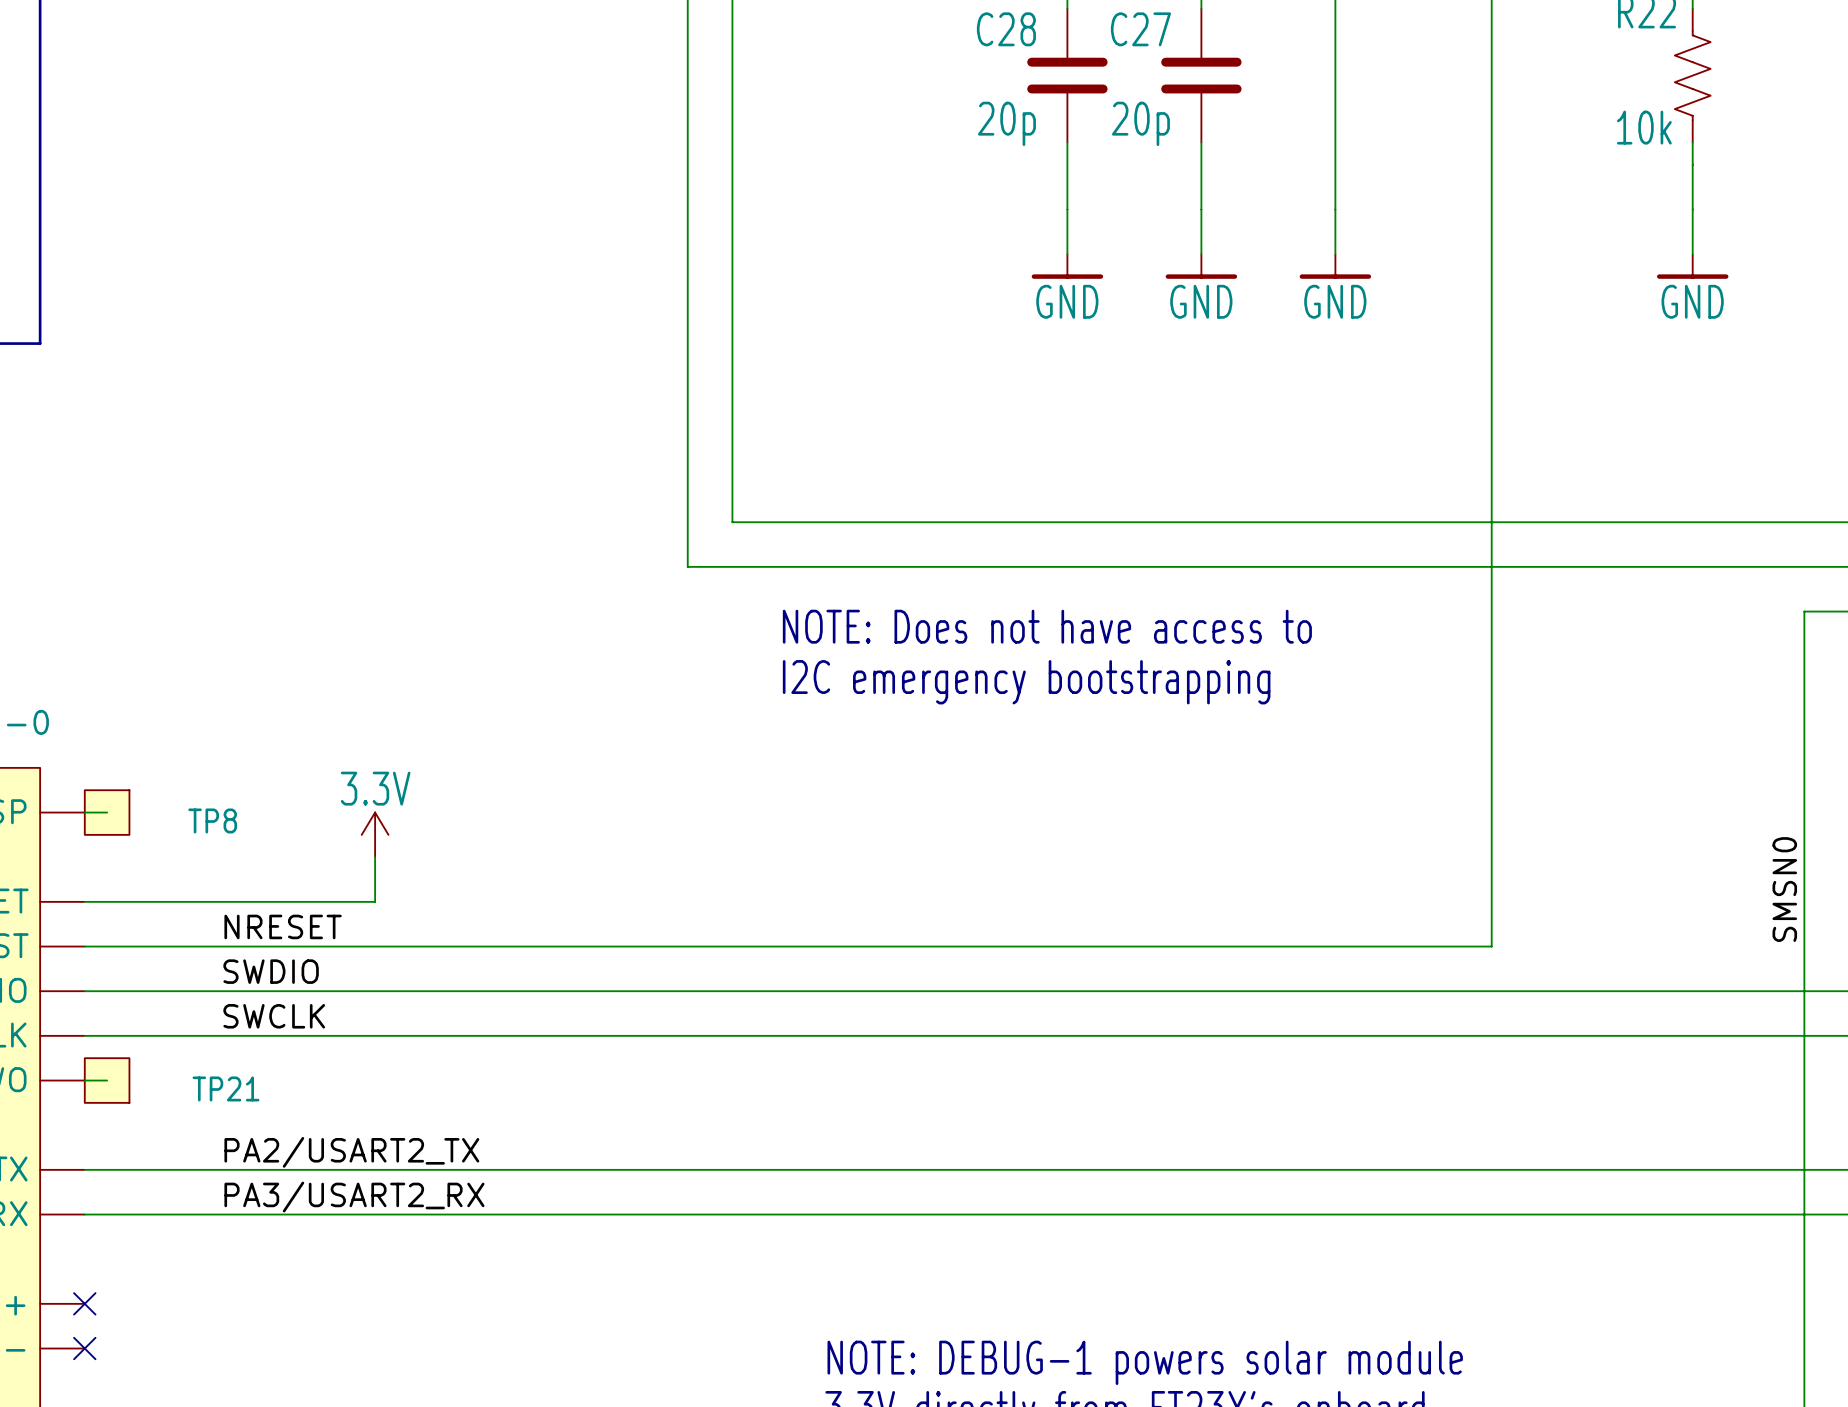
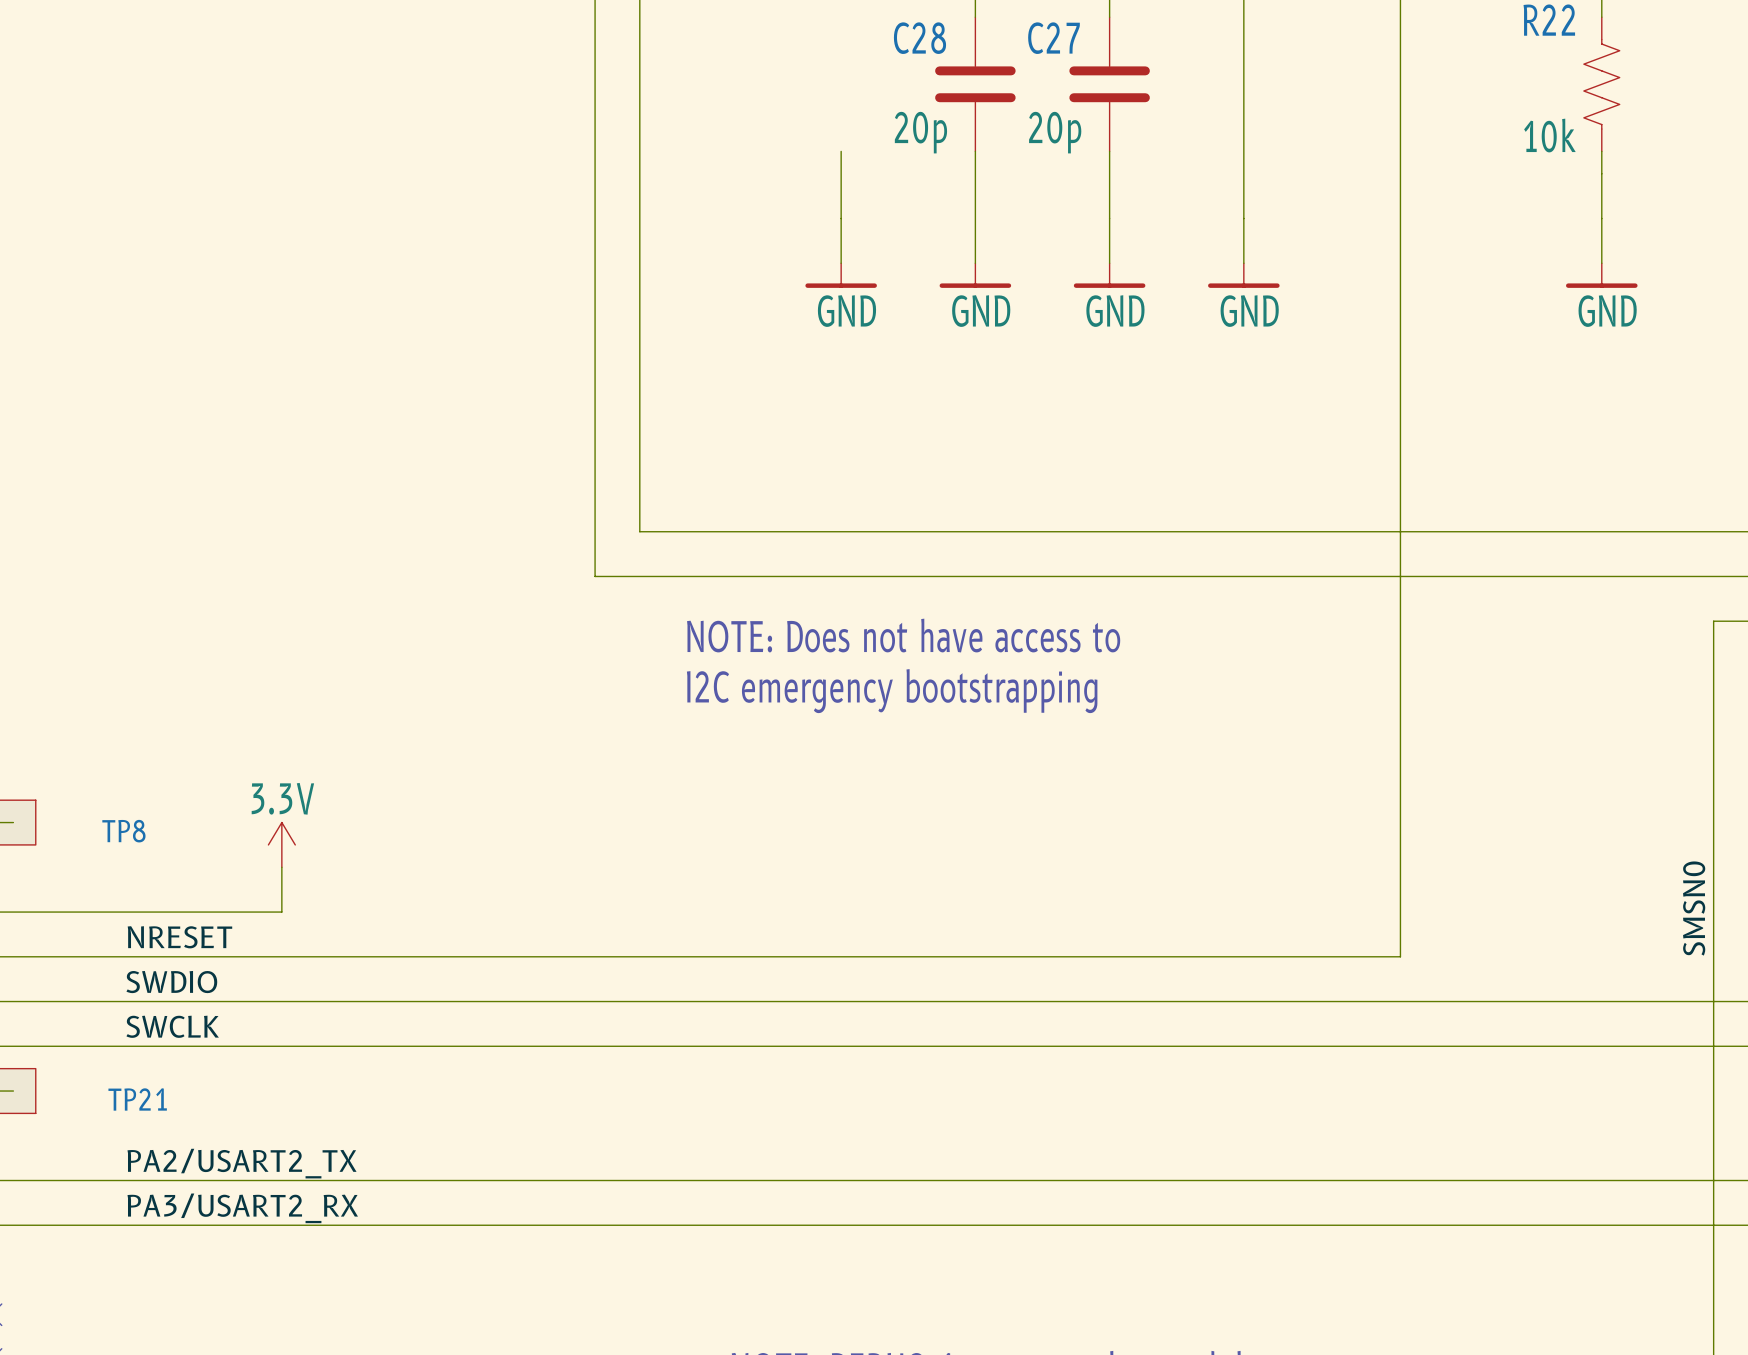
wire: none -> (841, 151) (841, 263)
power symbol: none -> GND (841, 275)

